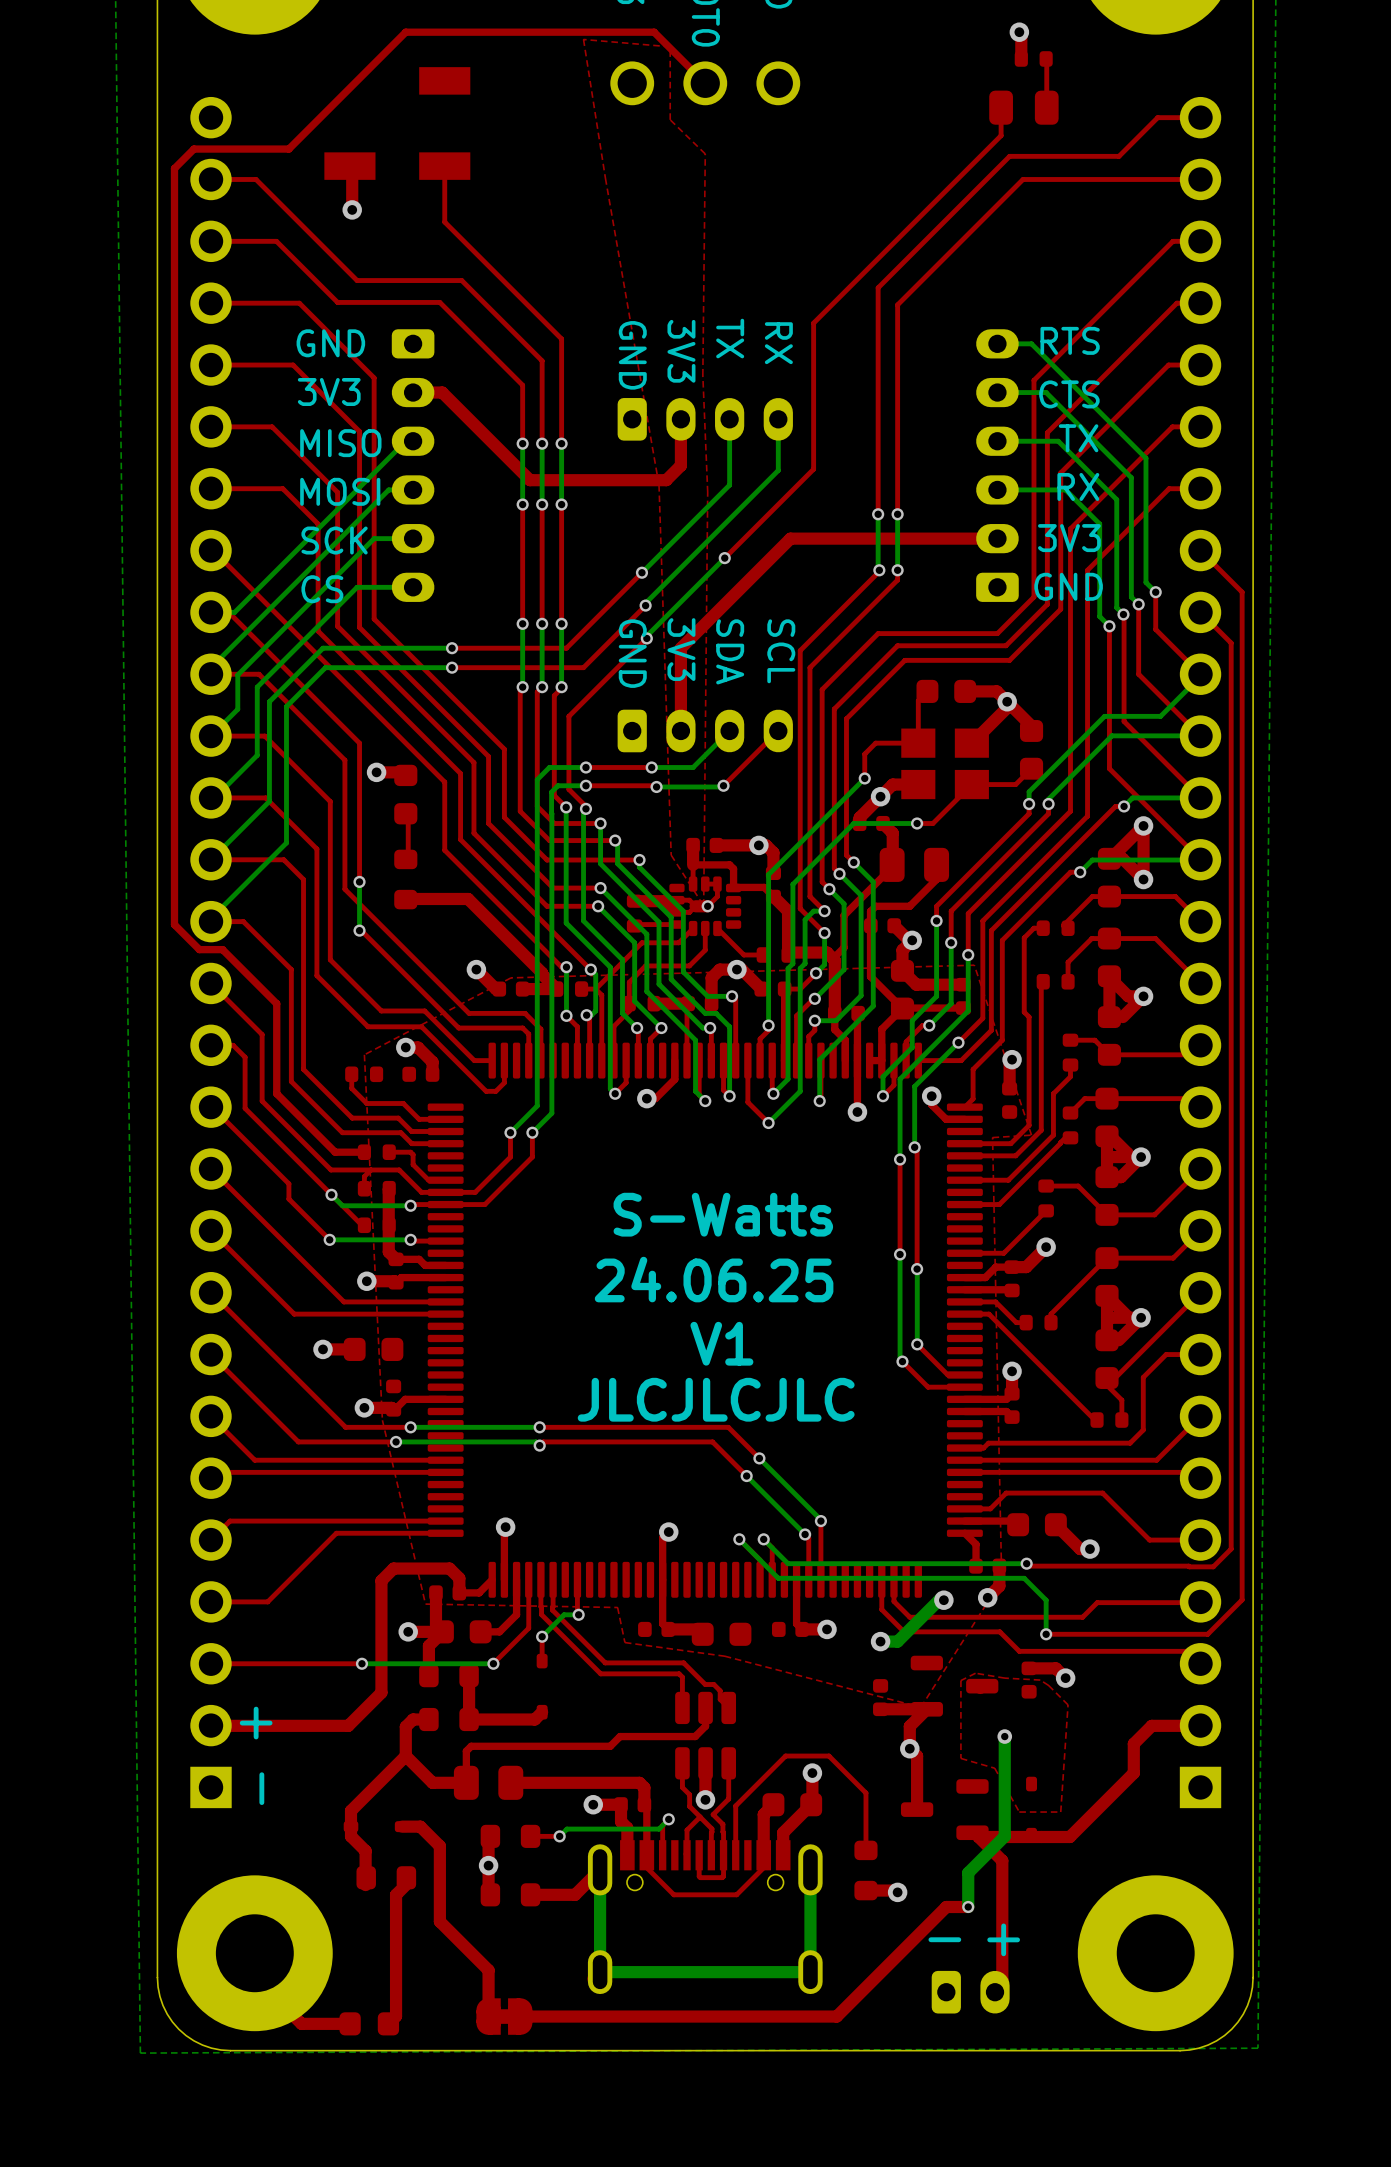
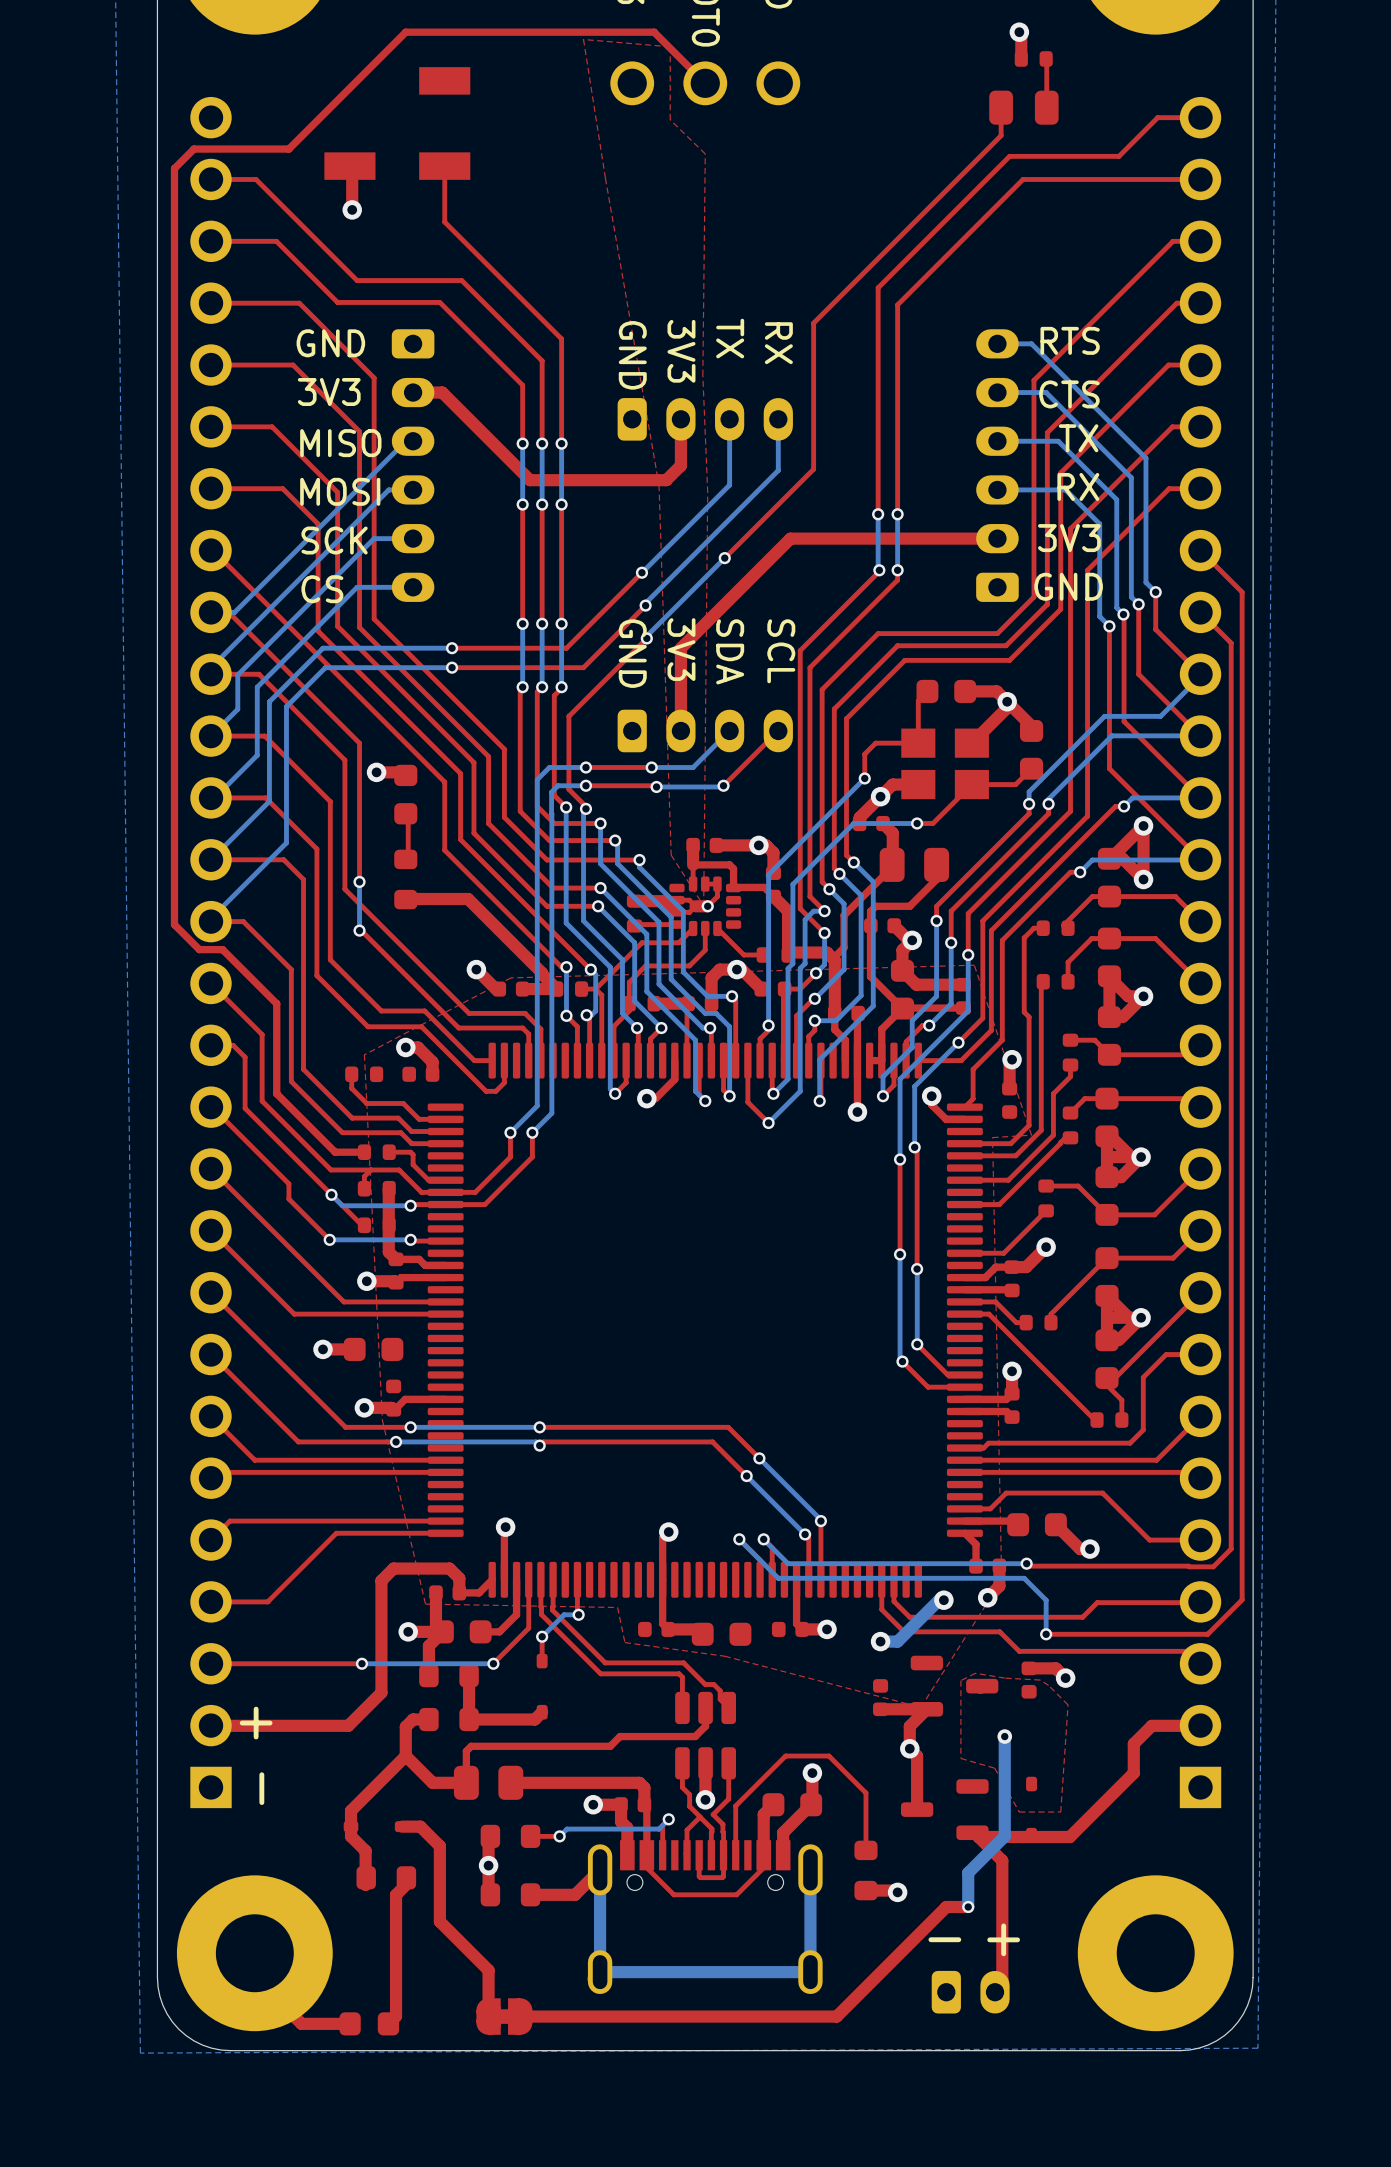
text: S-Watts (723, 1214) -> none
text: 24.06.25 (714, 1279) -> none
text: V1 (721, 1343) -> none
text: JLCJLCJLC (716, 1399) -> none

